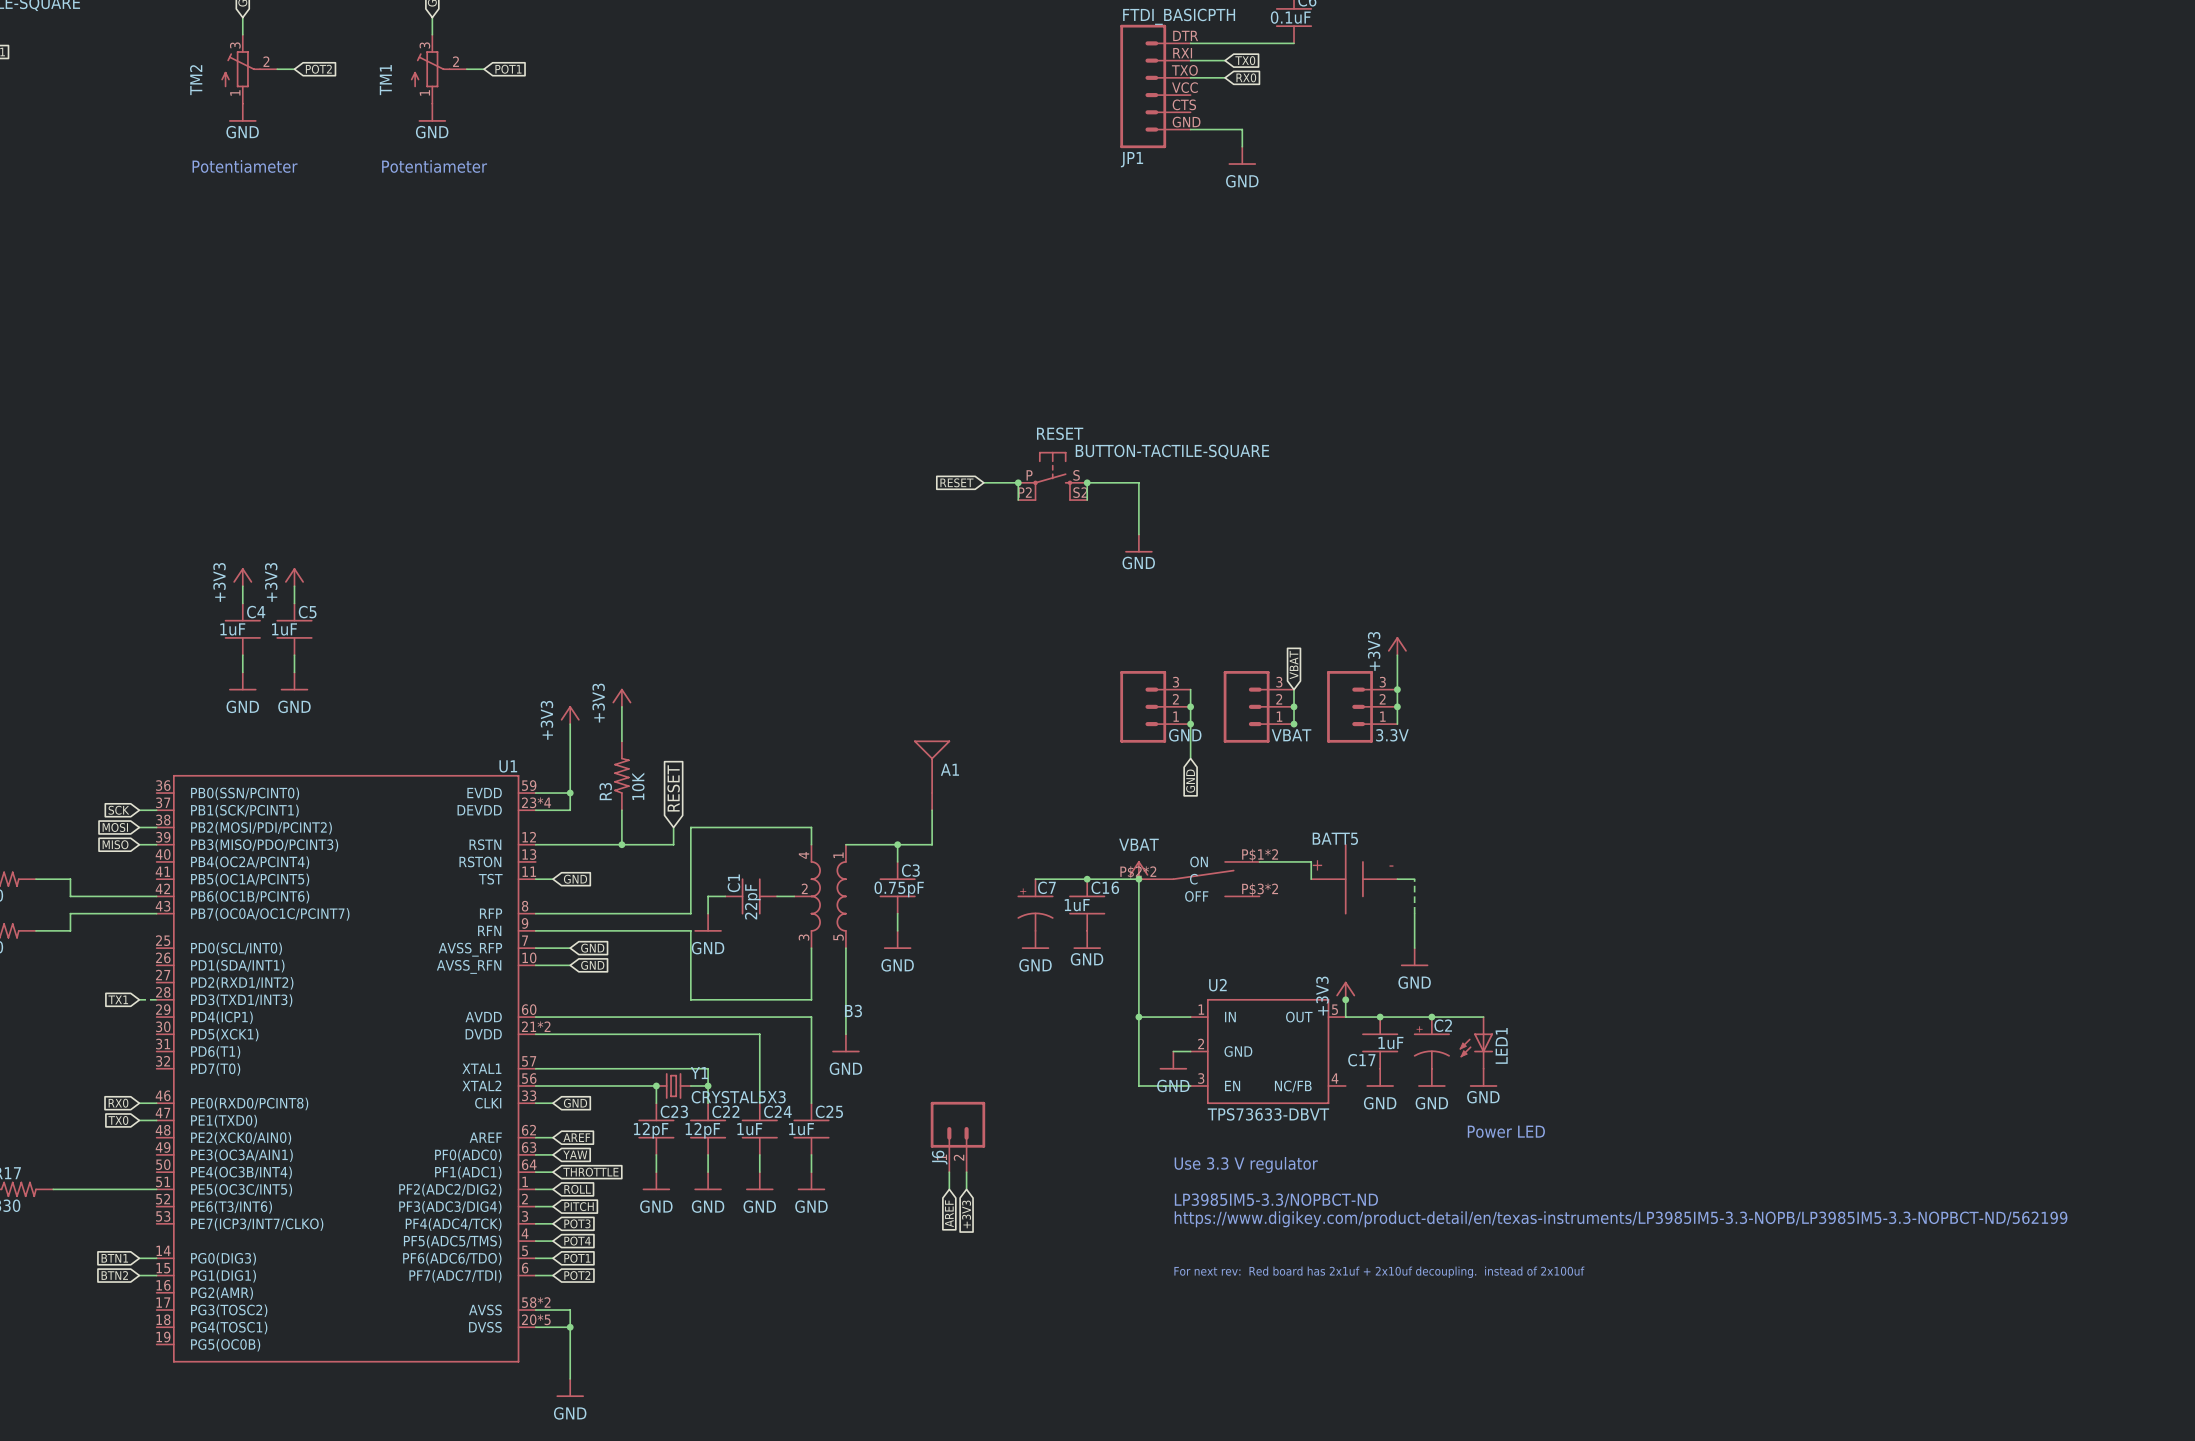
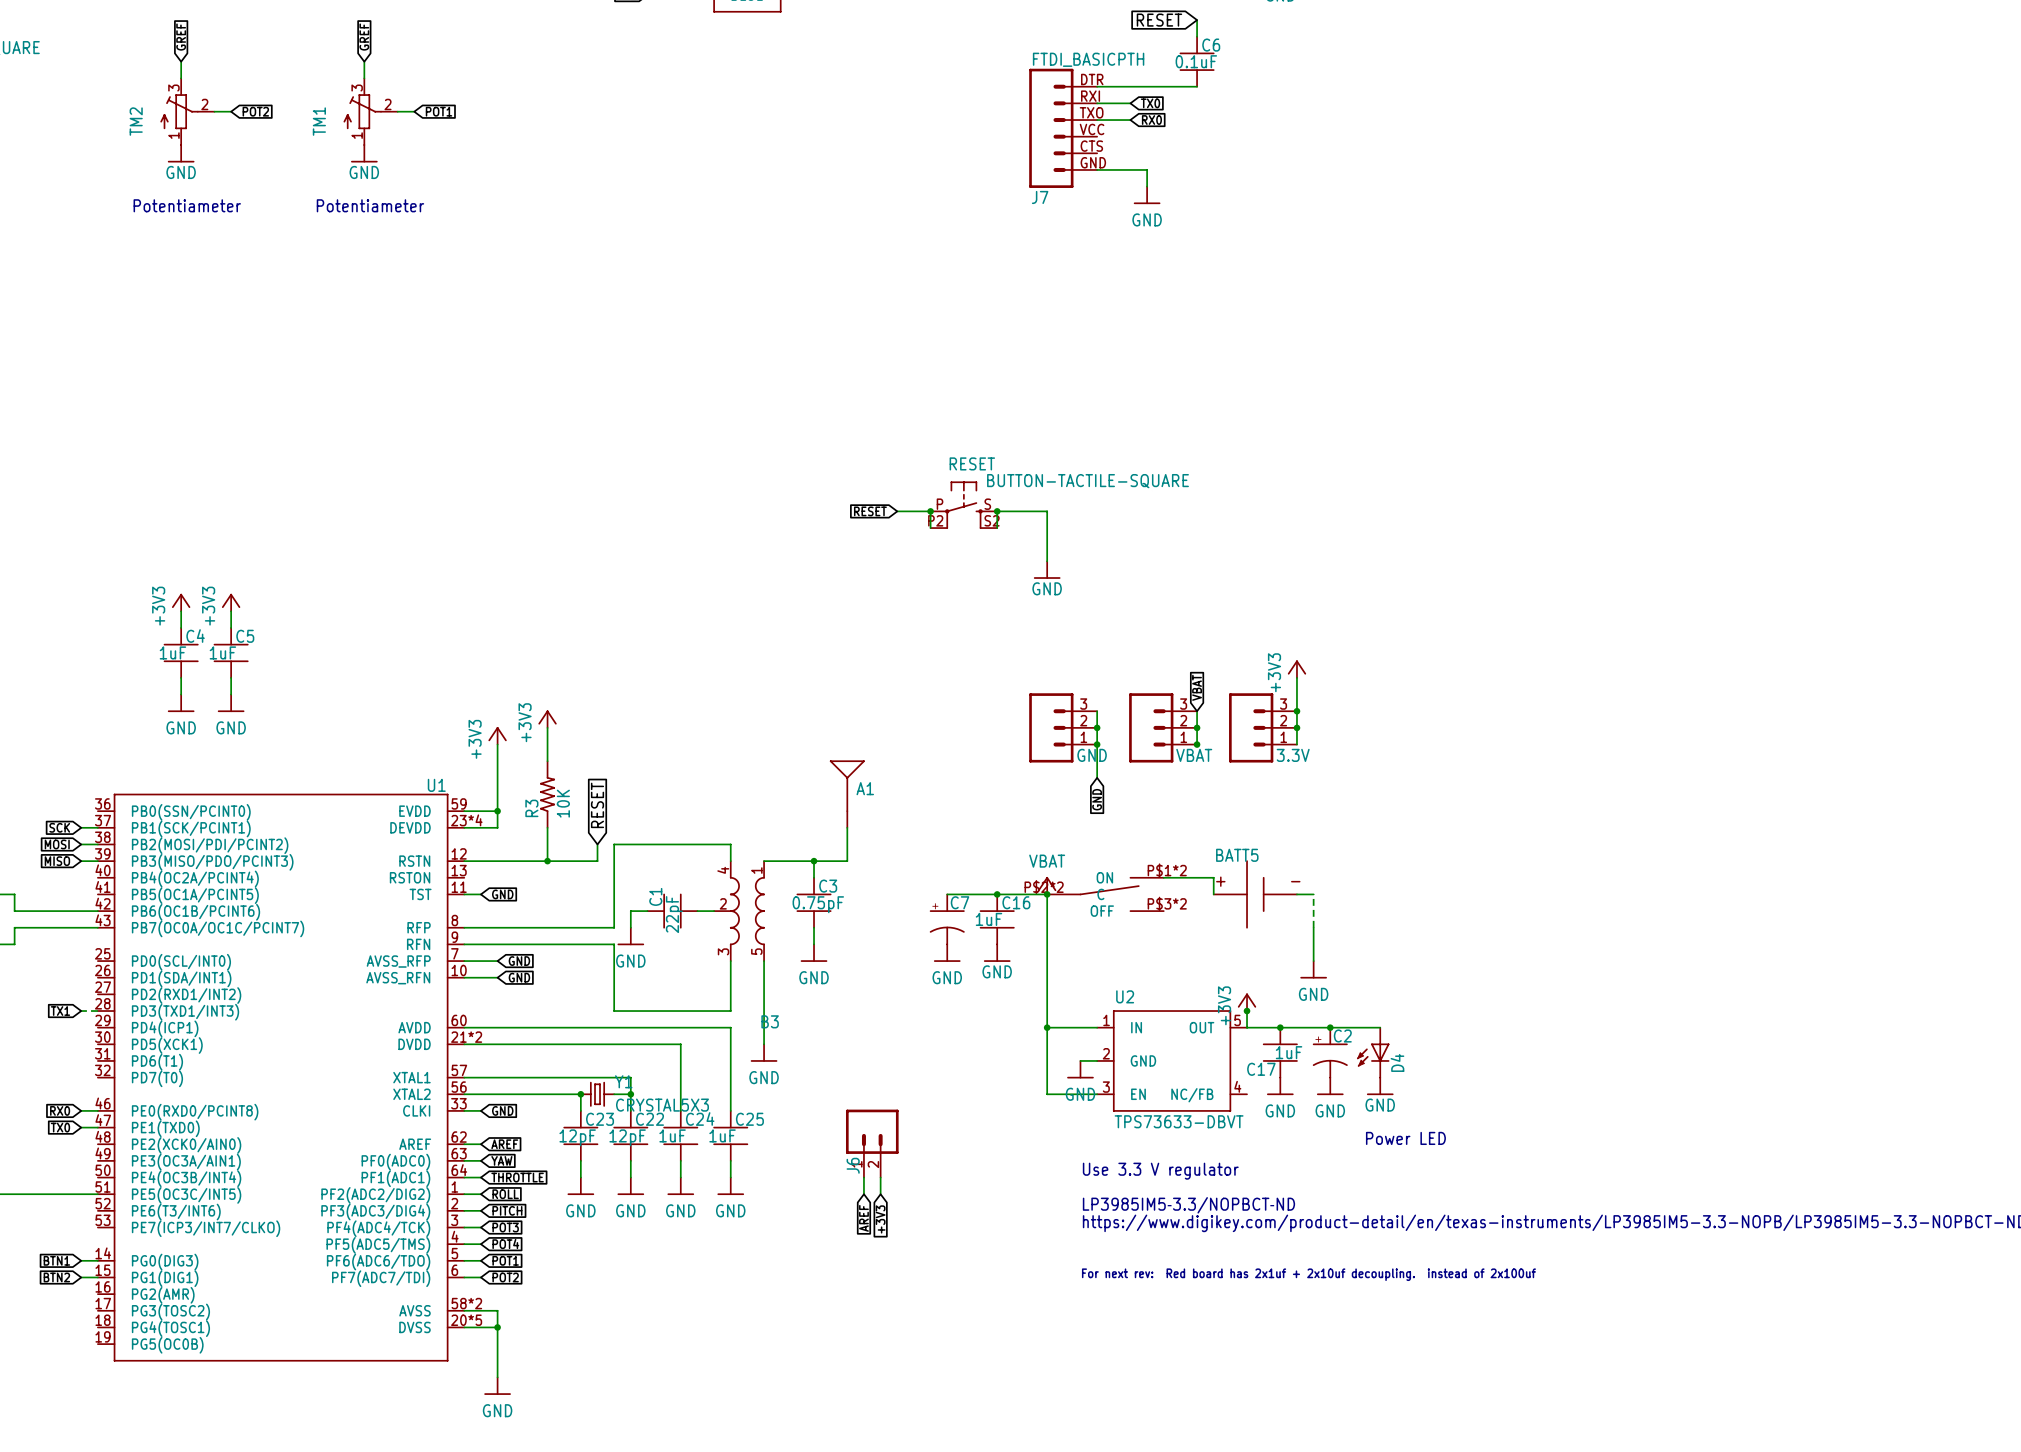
JP1 name: JP1 (1132, 159) -> J7 (1040, 197)
LED1 name: LED1 (1501, 1045) -> D4 (1397, 1062)

